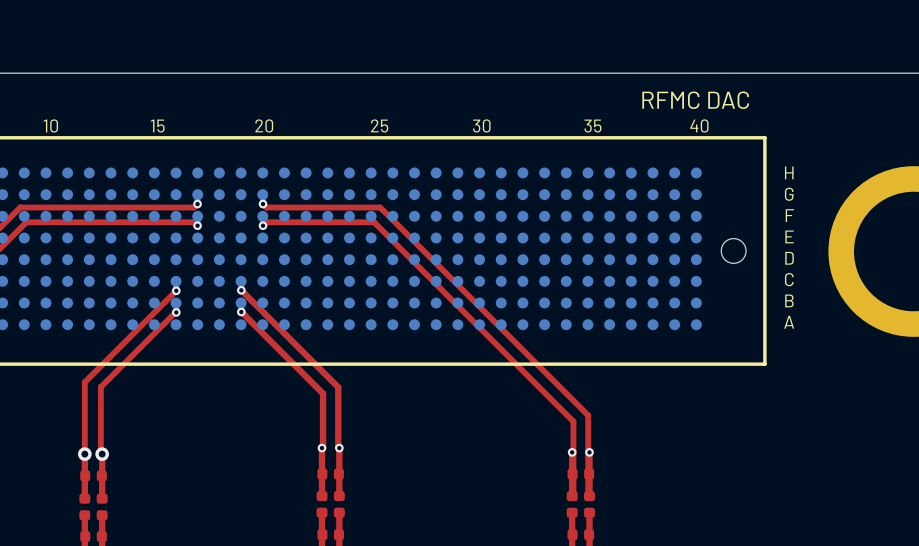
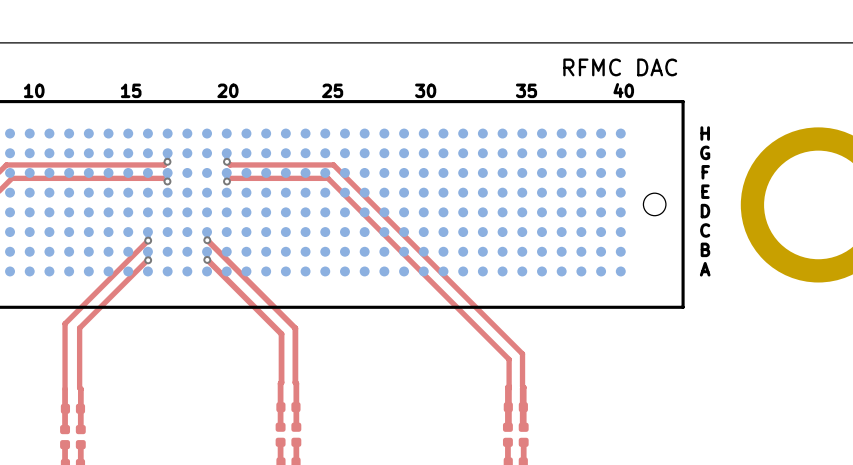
via: (322, 448) -> none
via: (339, 448) -> none
via: (572, 452) -> none
via: (589, 452) -> none
via: (84, 454) -> none
via: (102, 454) -> none

